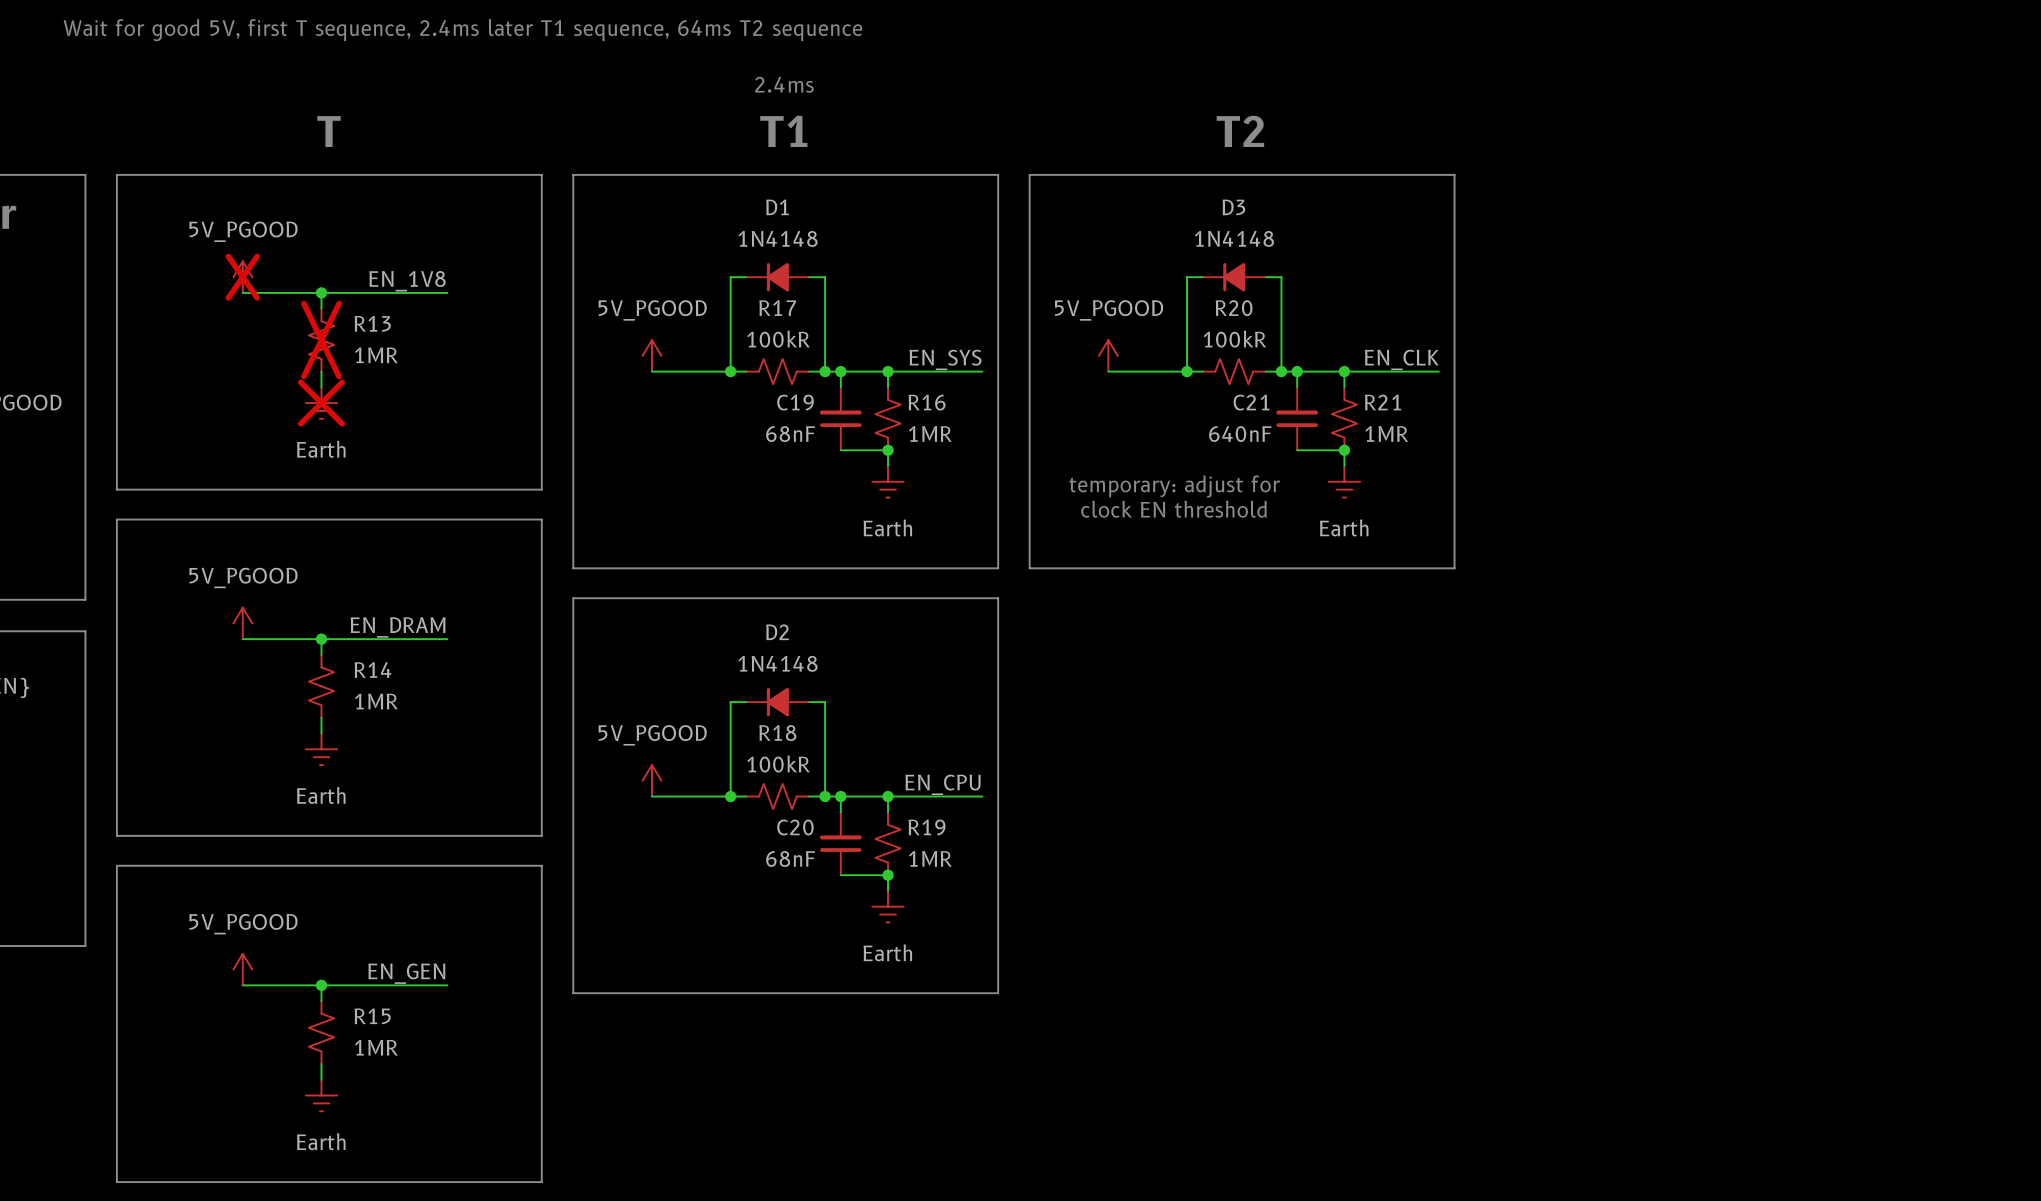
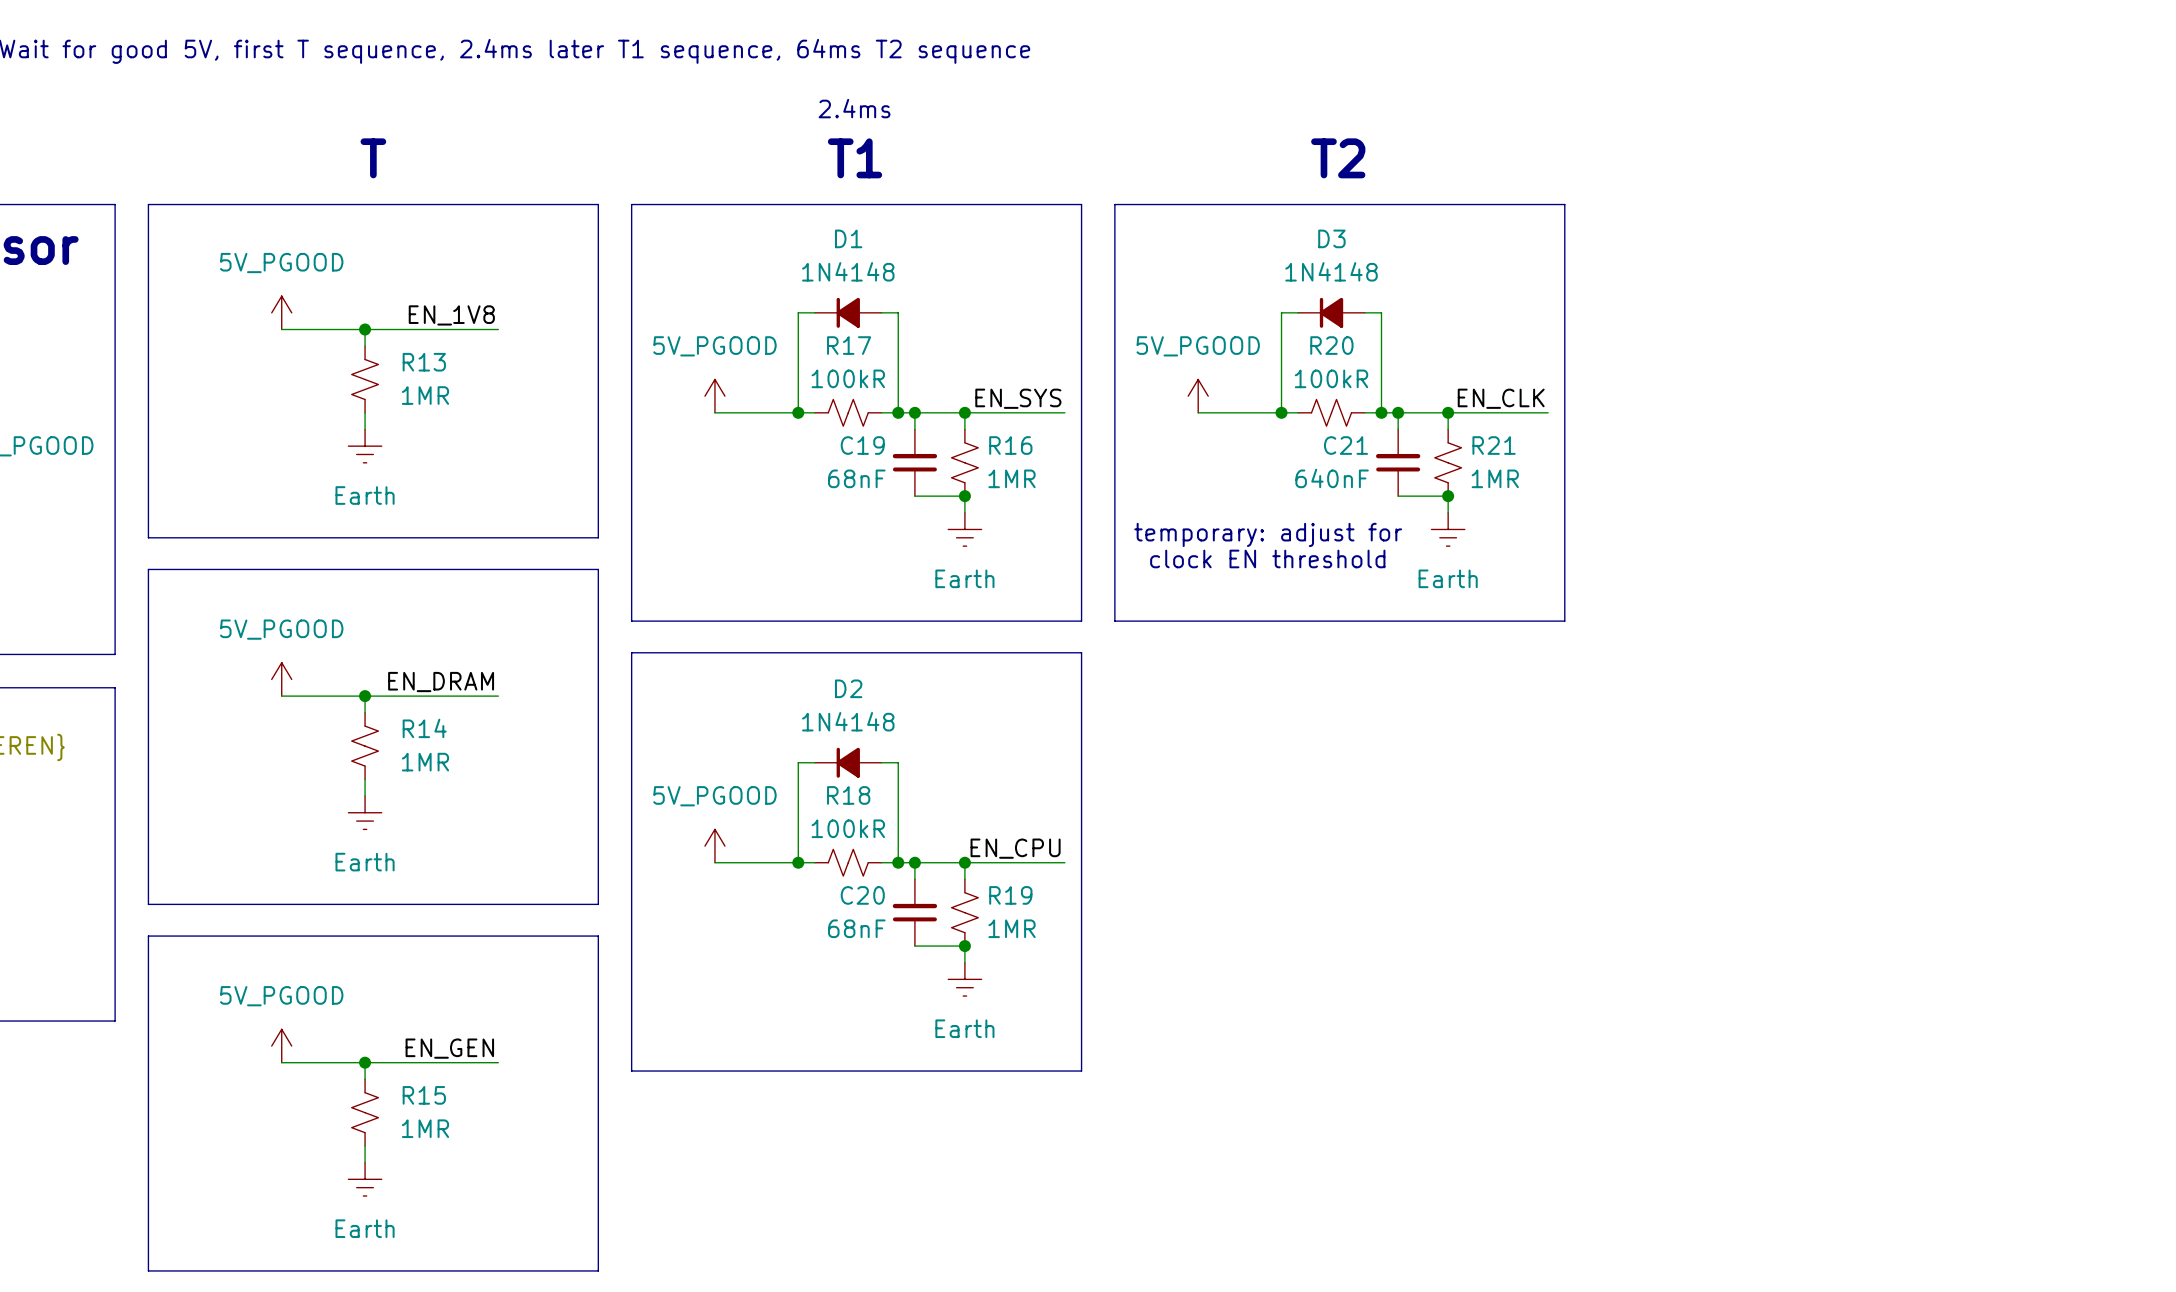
power symbol do-not-place cross: (242, 277) -> none
R13 do-not-place cross: (321, 340) -> none
power symbol do-not-place cross: (321, 403) -> none

